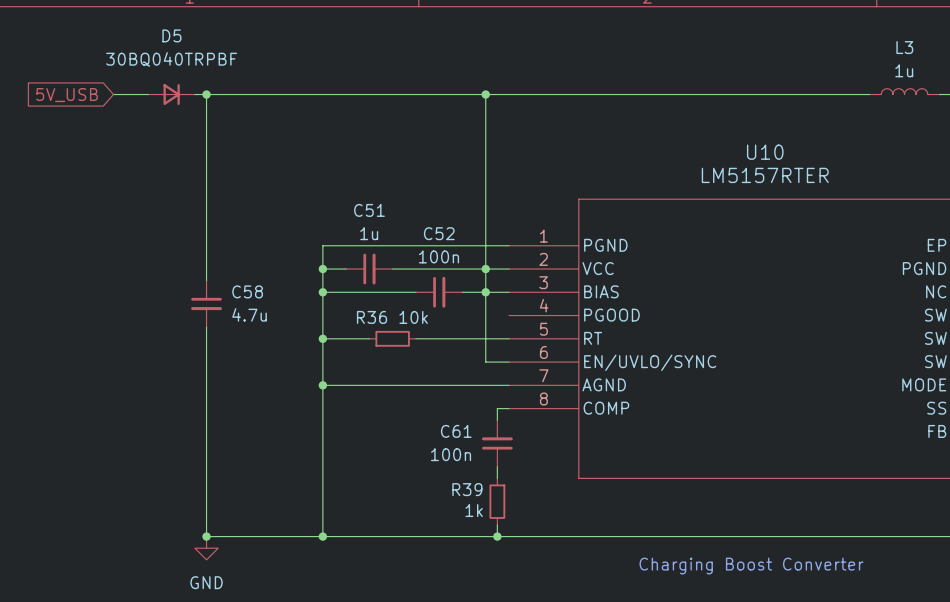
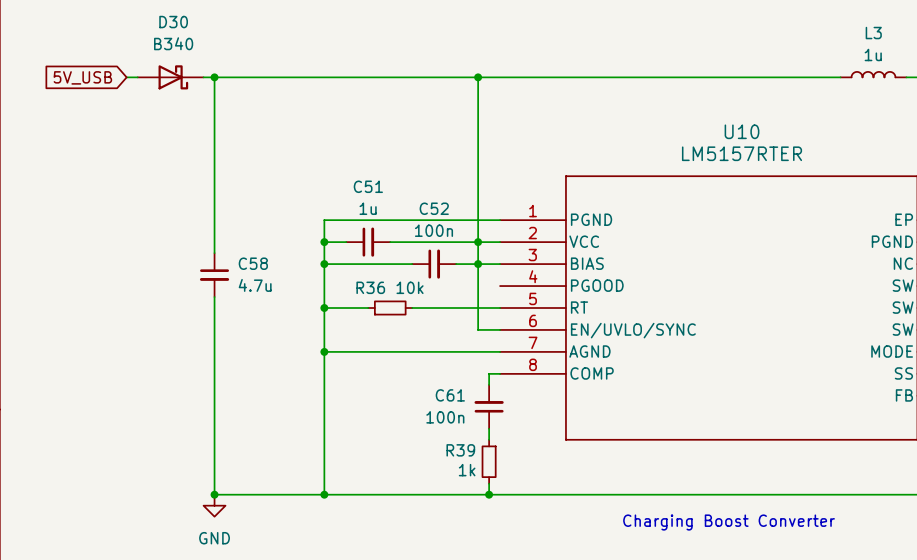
D30: none -> B340 (170, 77)
D5: 30BQ040TRPBF (171, 94) -> none

